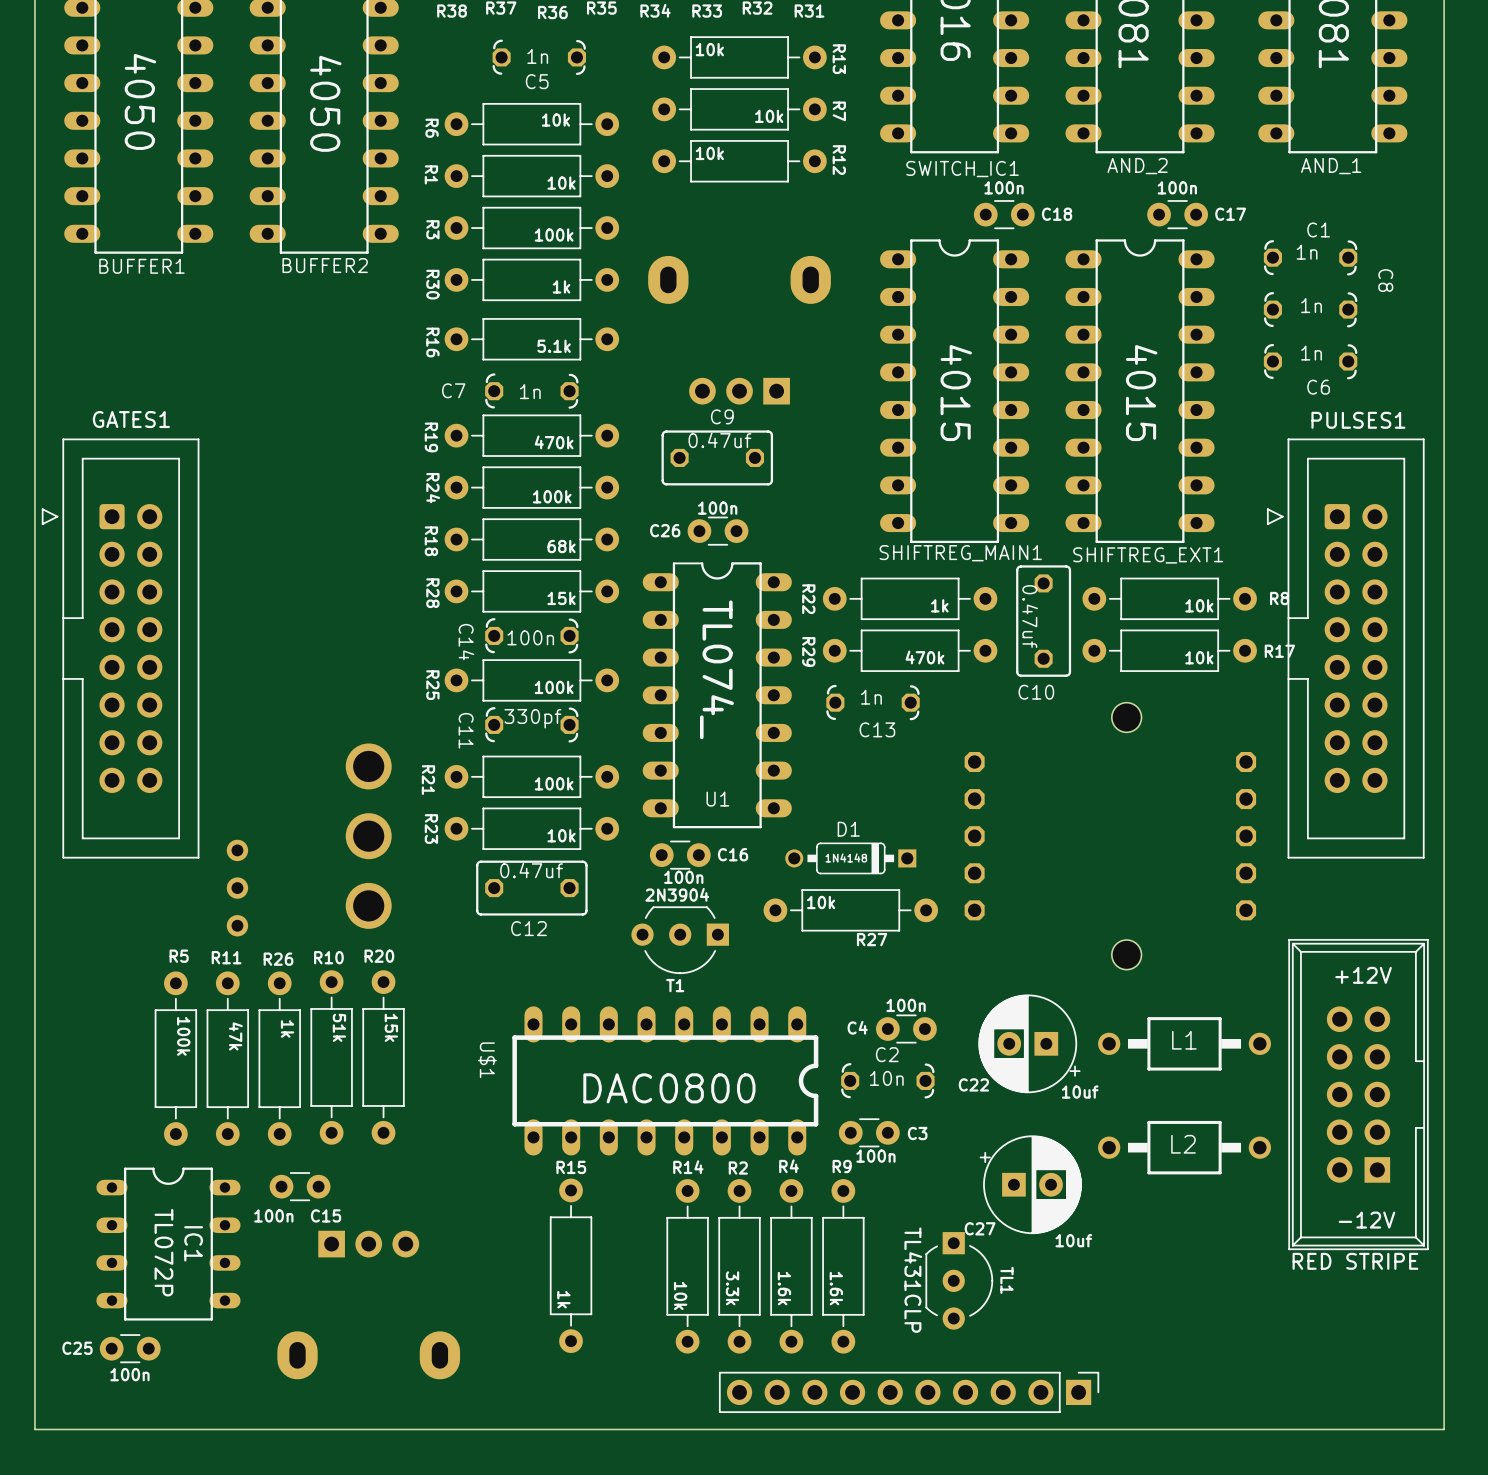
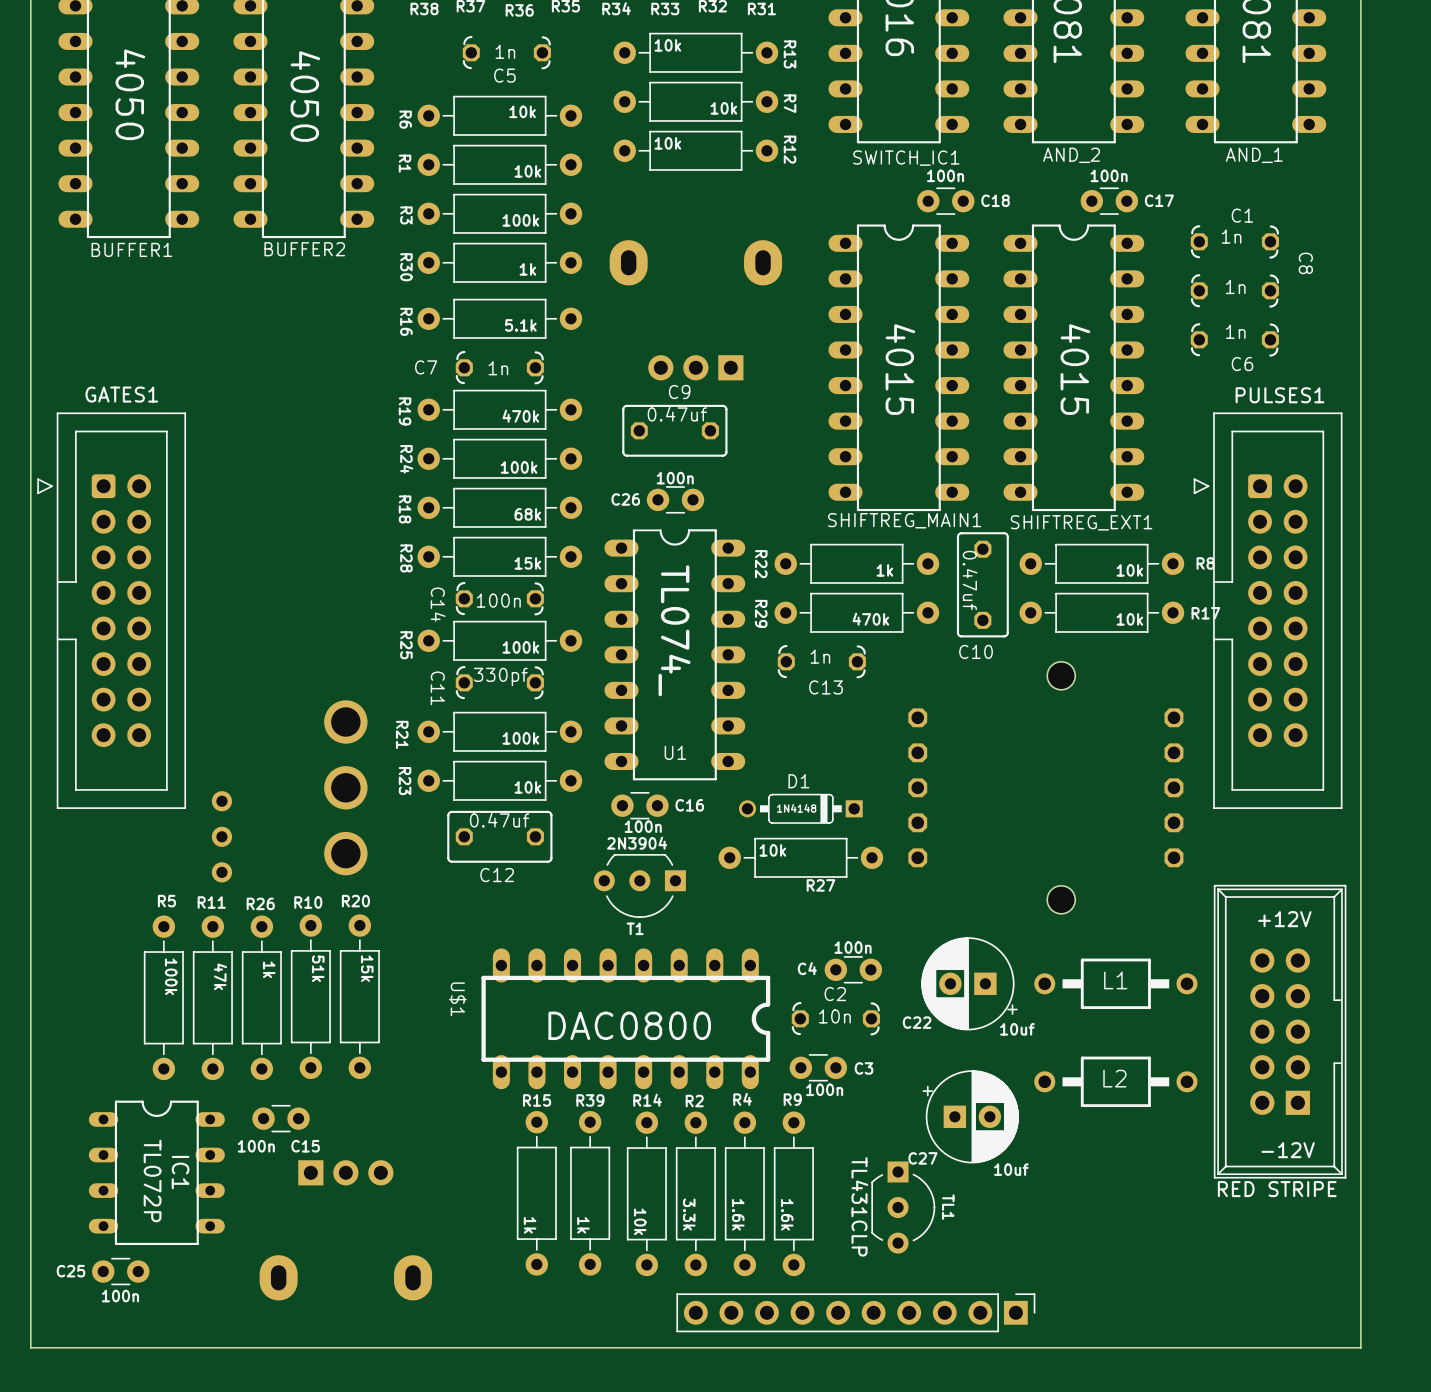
R39: none -> 1k (590, 1193)

